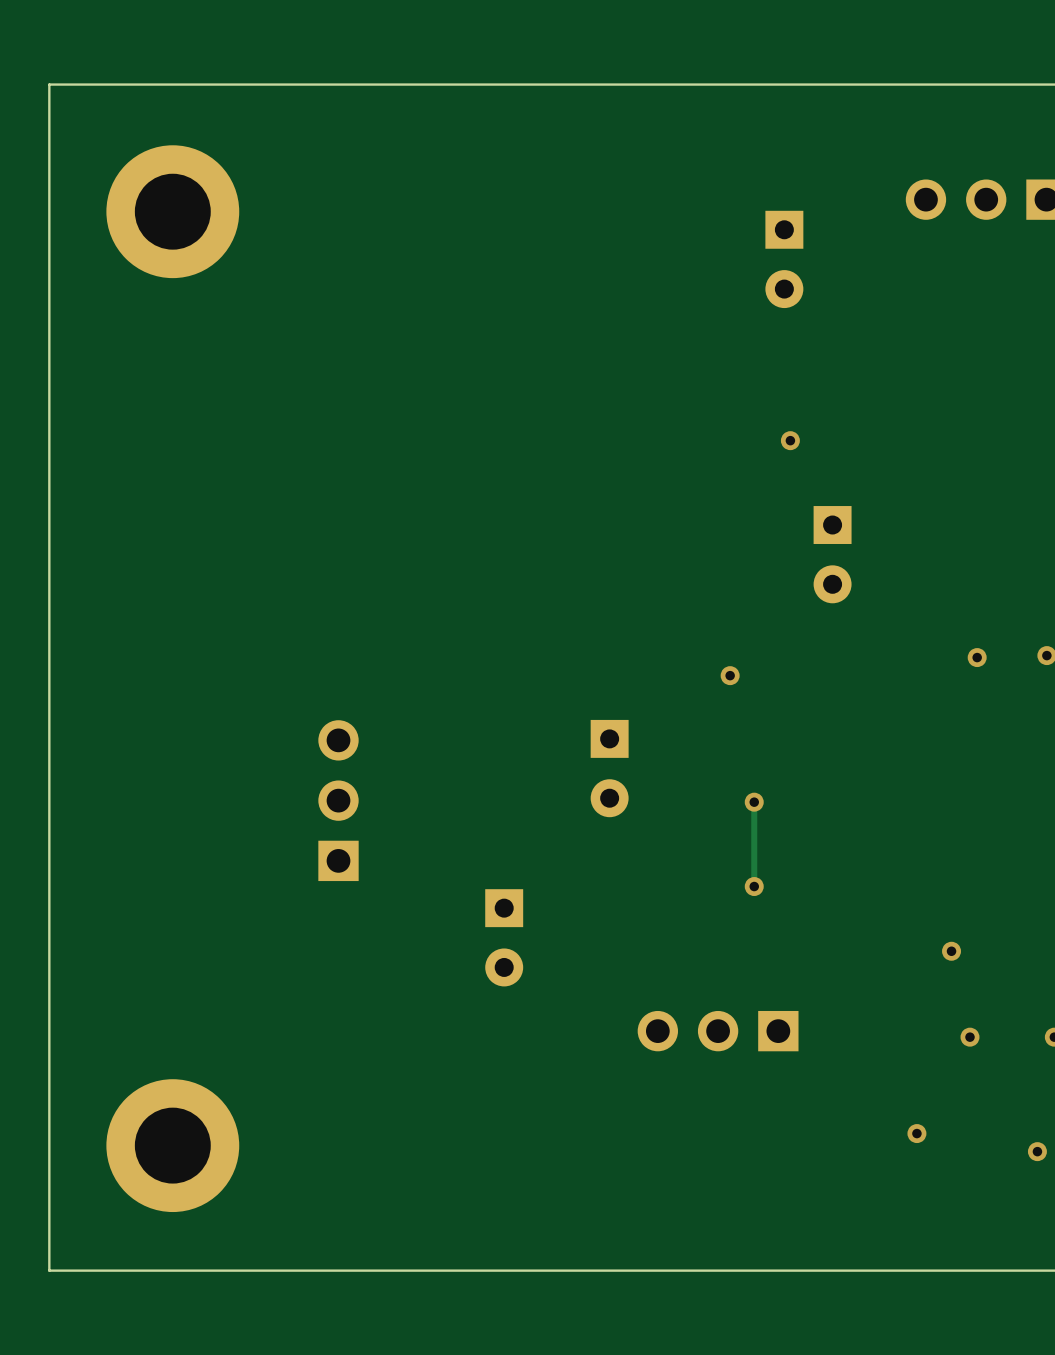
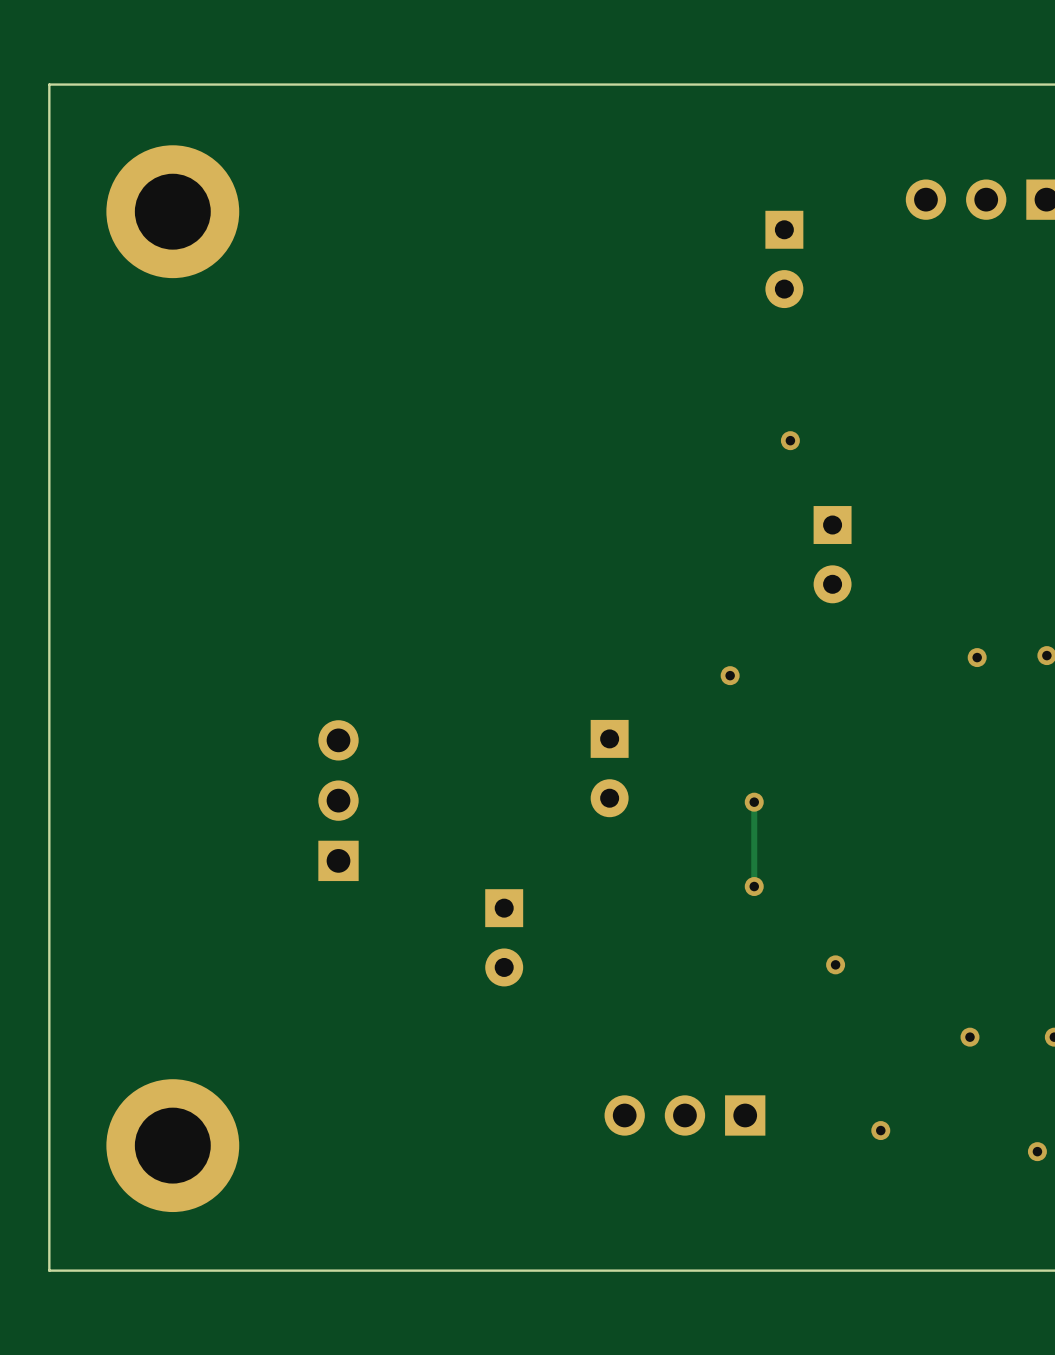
via: (951, 951) -> none
via: none -> (835, 964)
part position: (718, 1031) -> (684, 1115)
via position: (916, 1133) -> (880, 1130)

